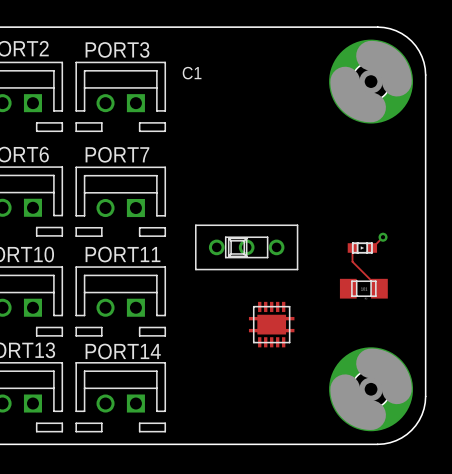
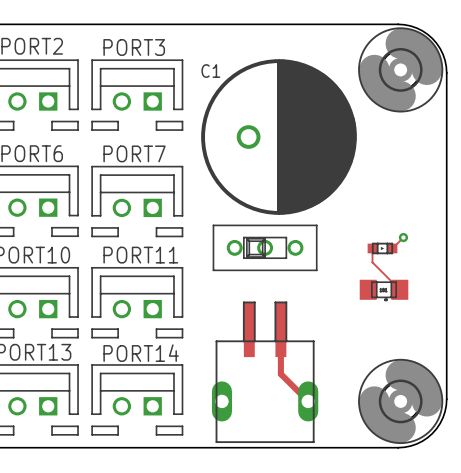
part: none -> (400, 69)
part: (371, 81) -> none
part: none -> (278, 137)
part: (271, 324) -> none
track: none -> (280, 329) (280, 374) (308, 401)
part: none -> (265, 372)
part: (371, 389) -> none
part: none -> (400, 401)

